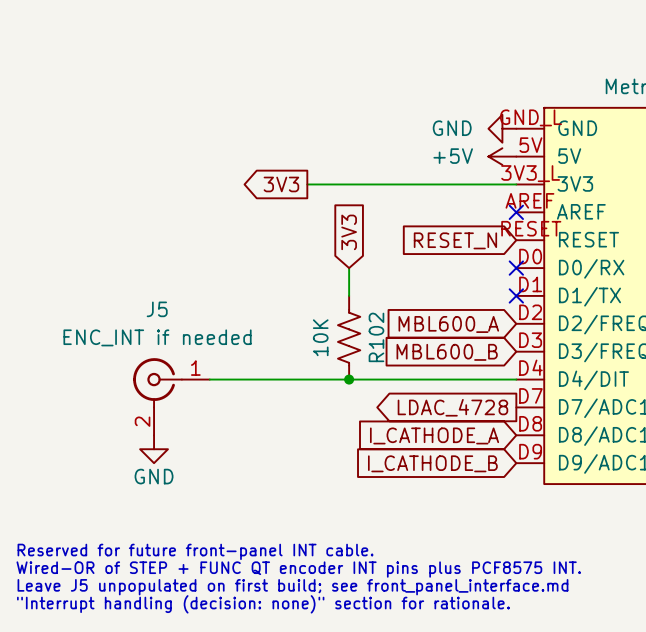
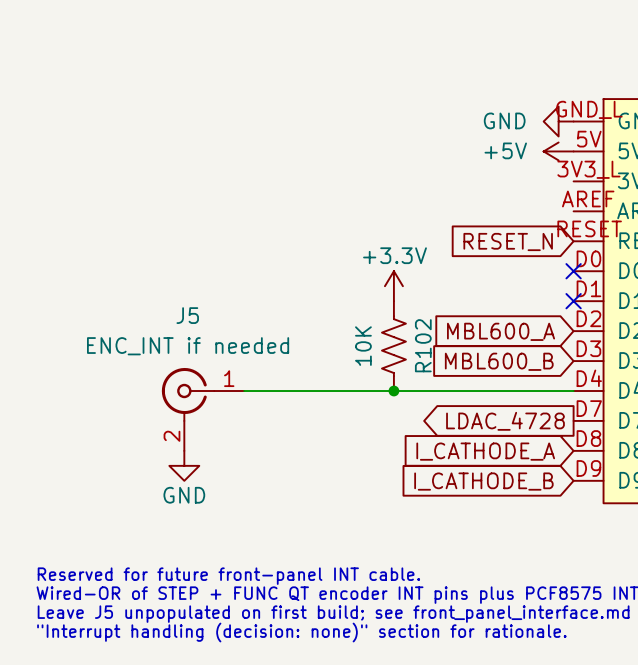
global label: 3V3 (281, 184) -> none
wire: (307, 184) (516, 184) -> none
no-connect mark: (516, 212) -> none
global label: 3V3 (349, 232) -> none
power symbol: none -> +3.3V (393, 286)

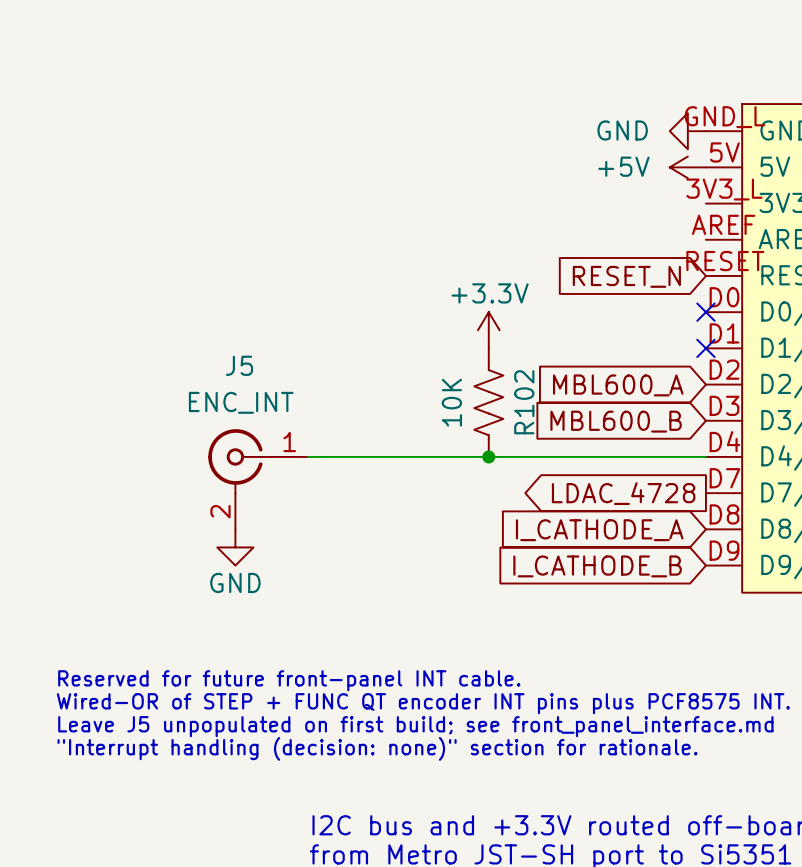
J5 value: ENC_INT if needed (188, 346) -> ENC_INT (241, 402)

